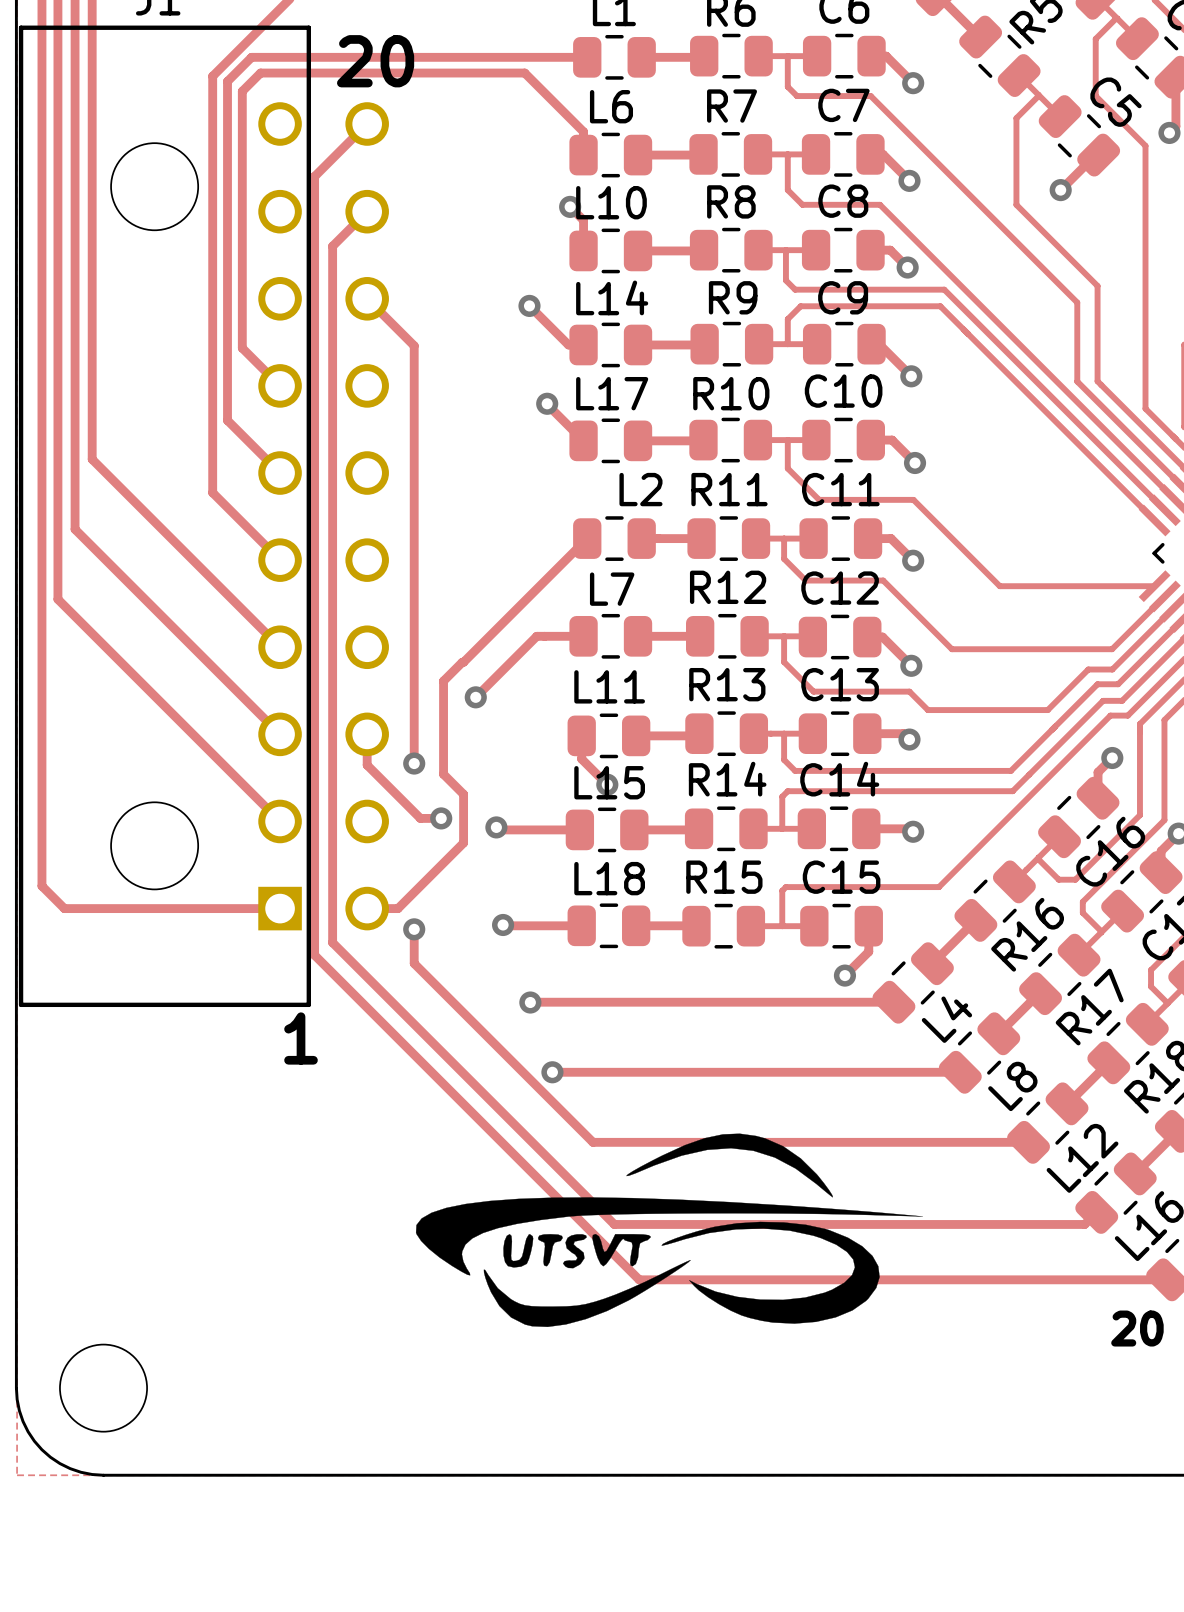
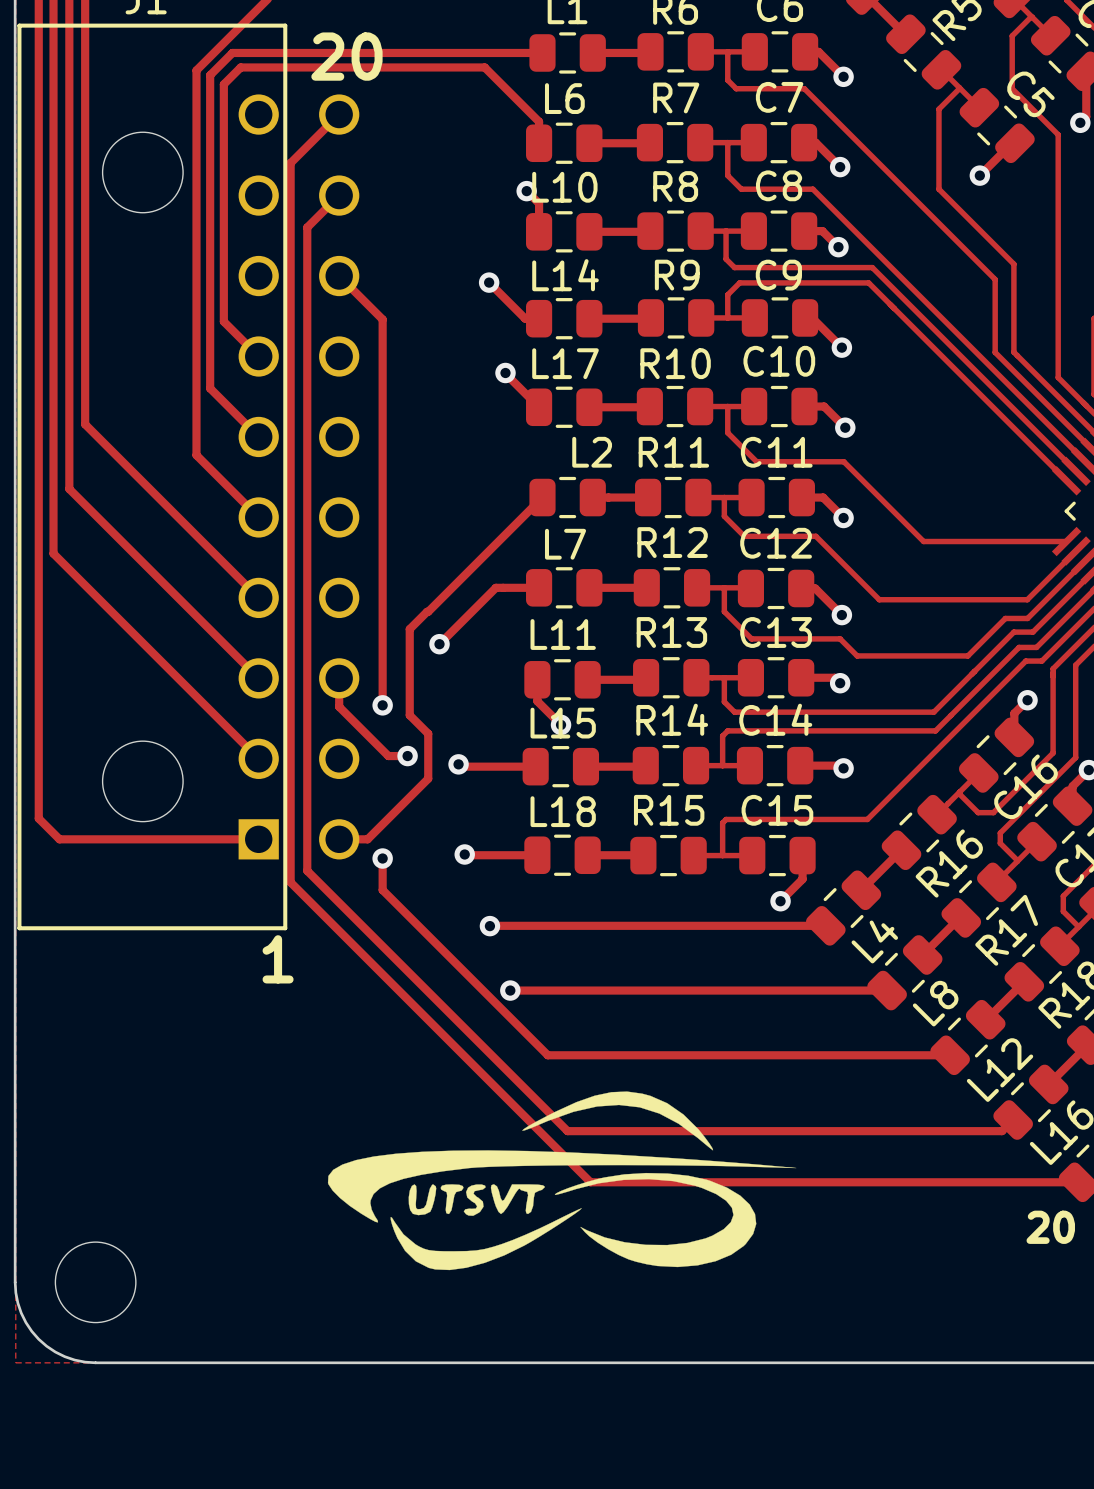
drawing position: (669, 1230) -> (562, 1180)

